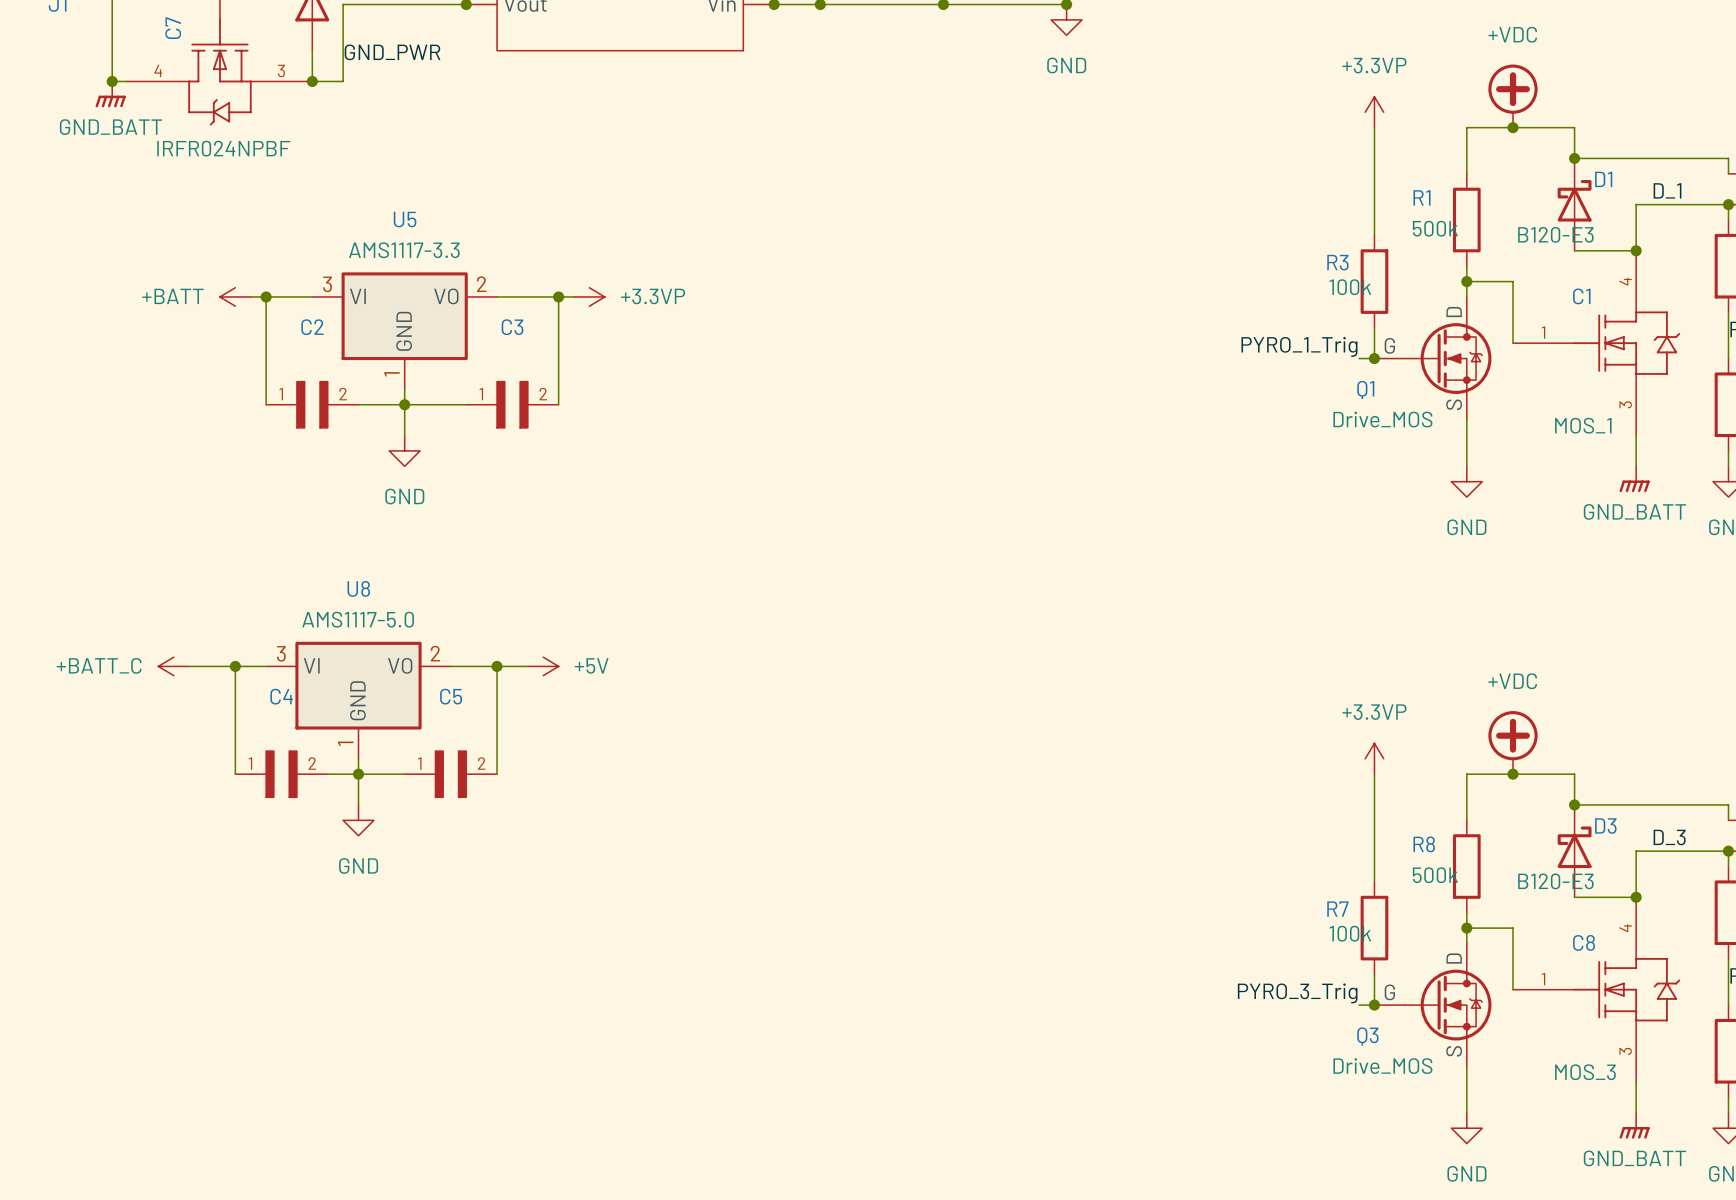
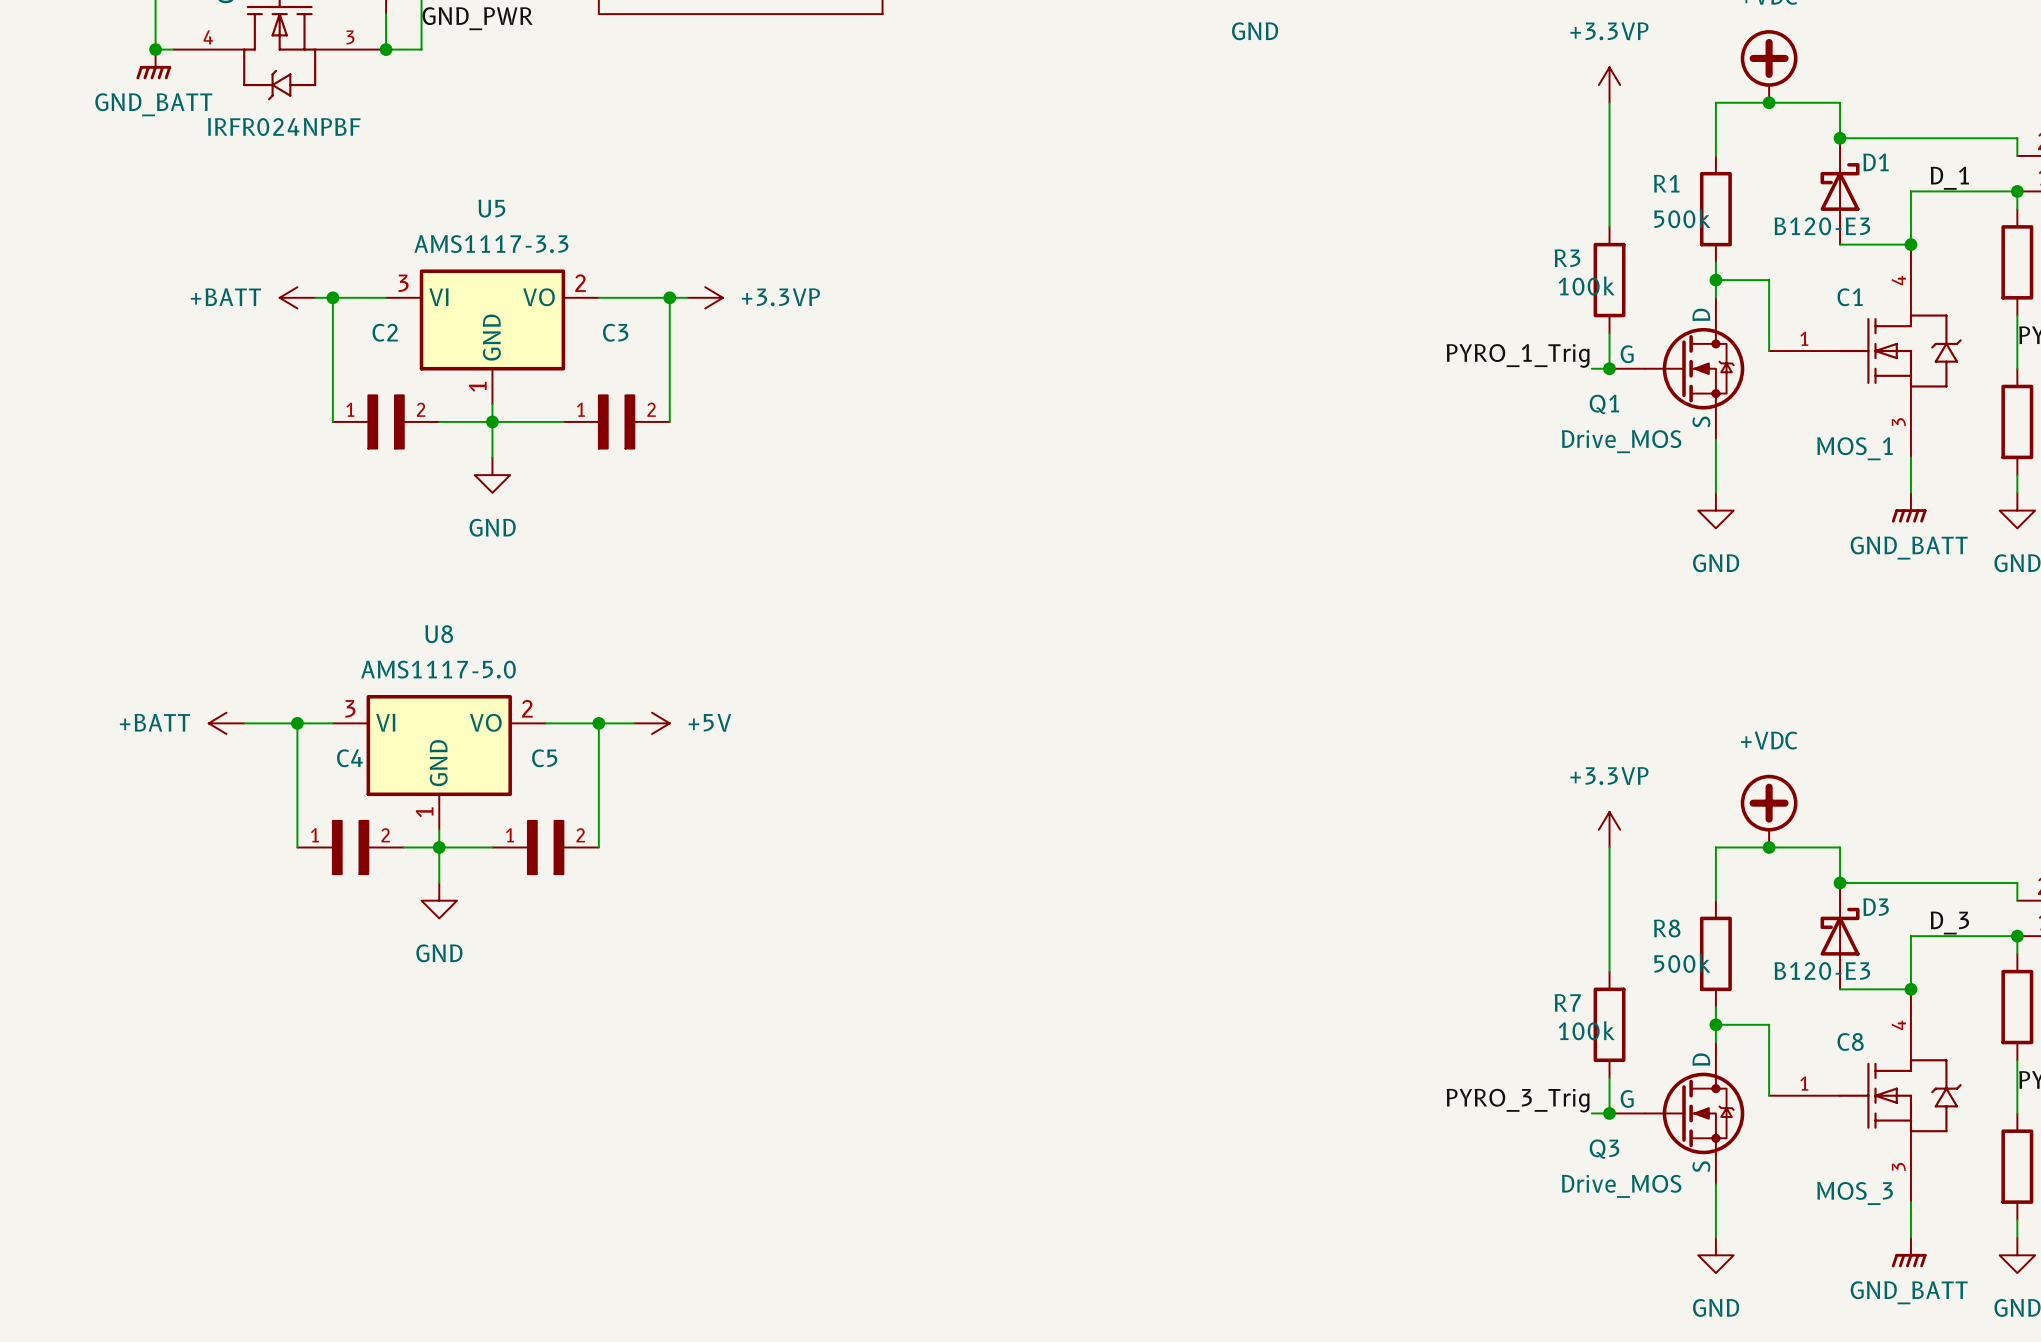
power symbol: +BATT_C (173, 666) -> +BATT (226, 723)

